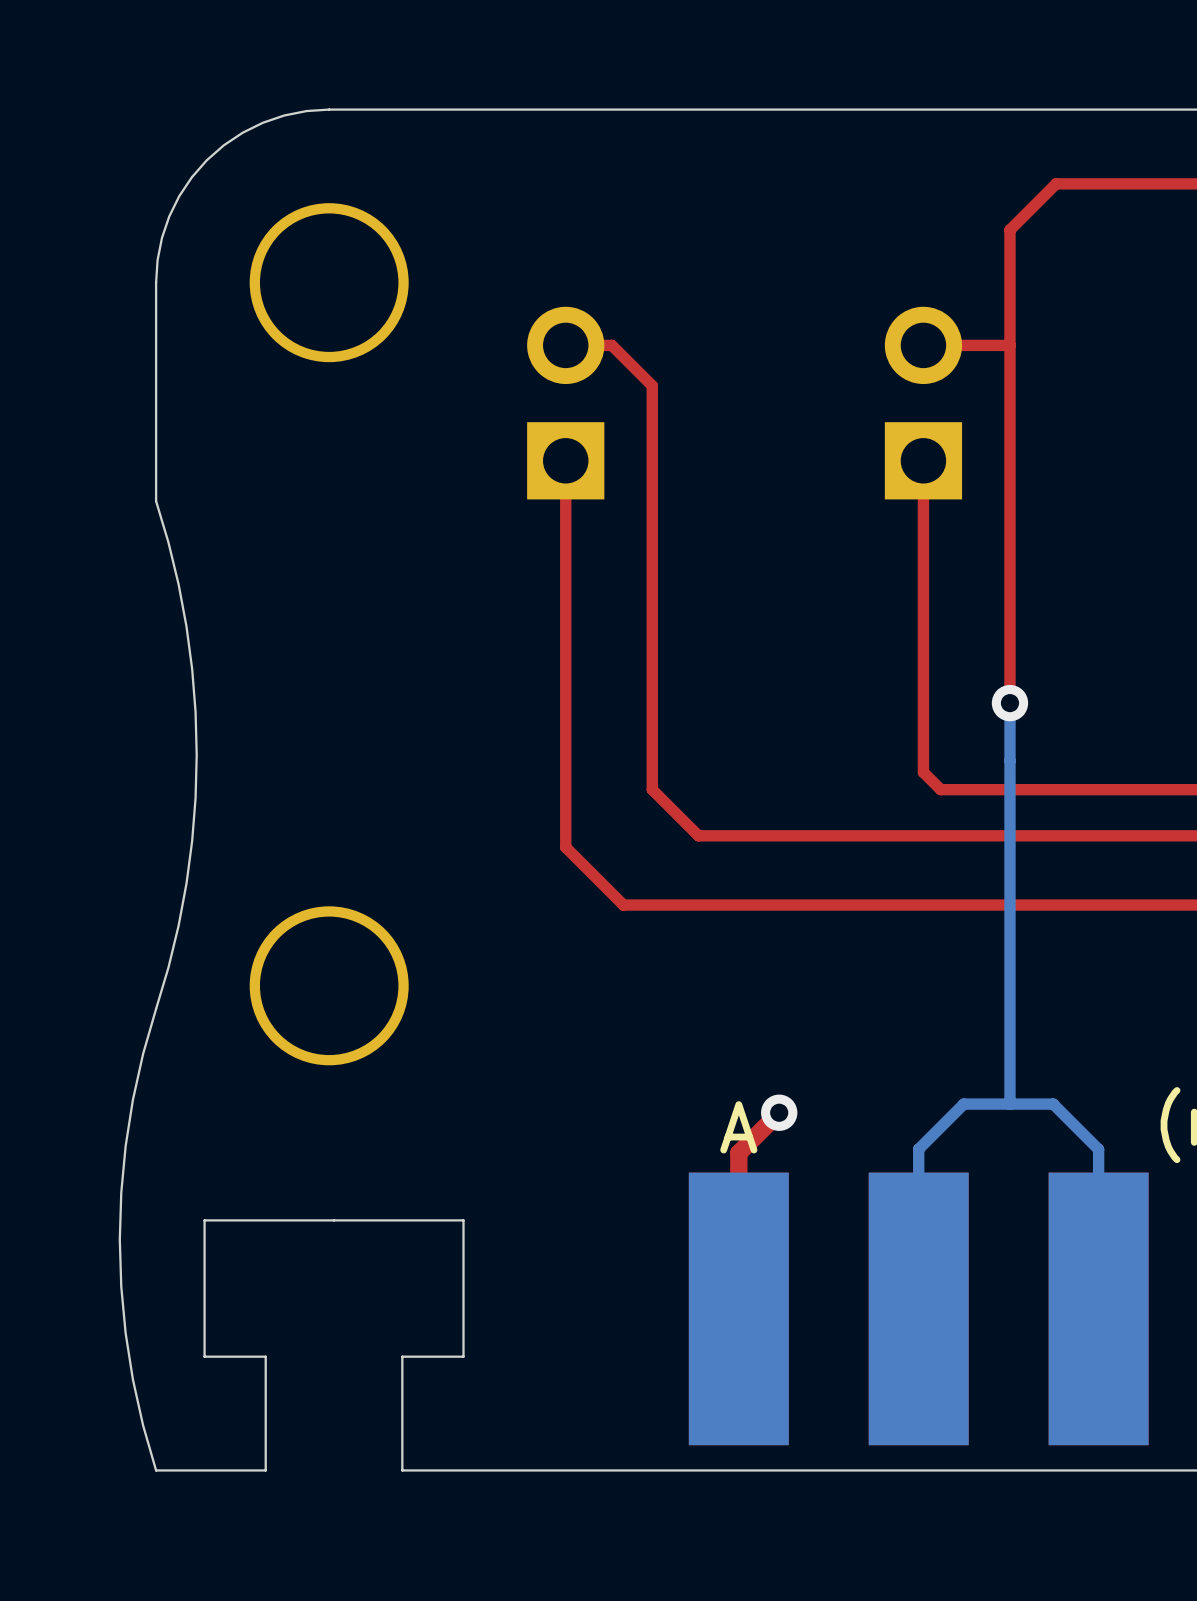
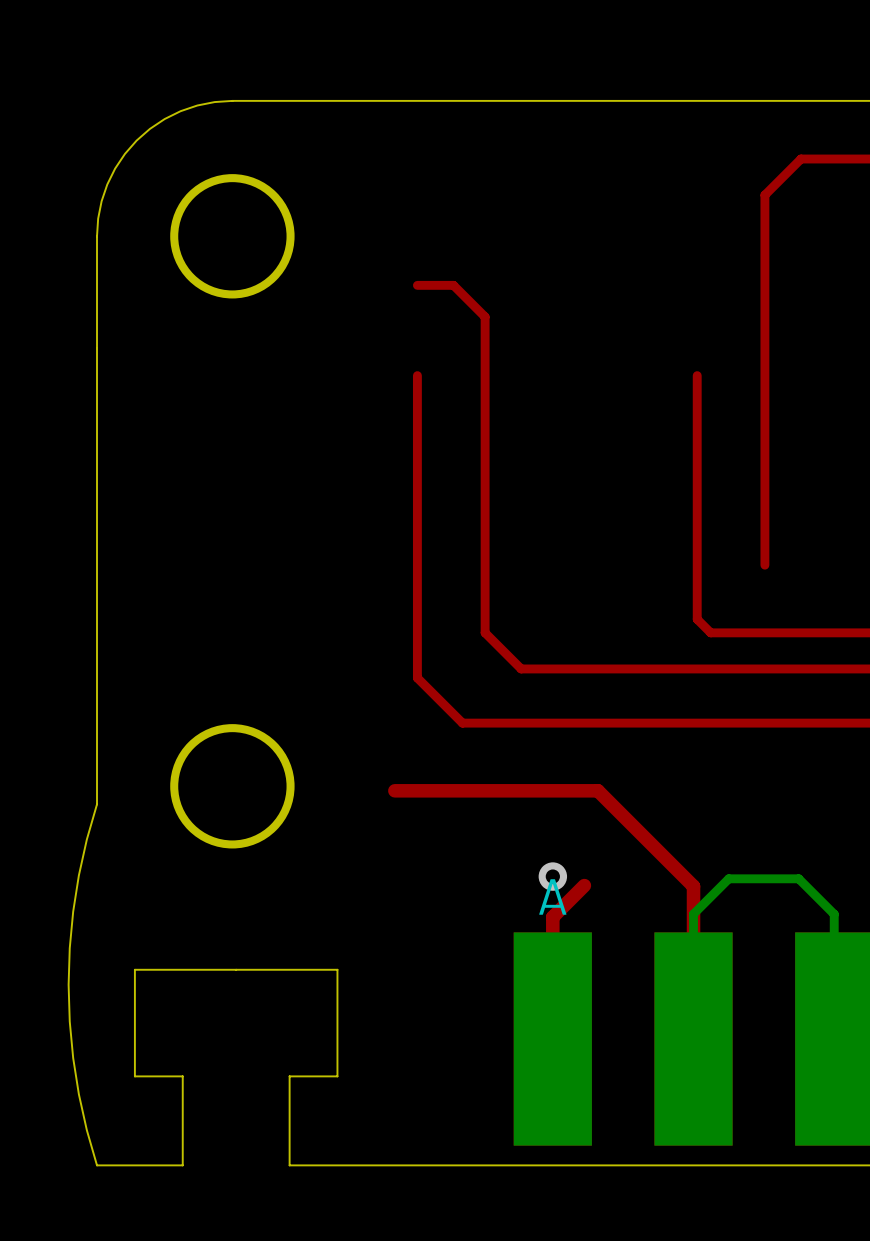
top track: (1009, 345) (923, 345) -> none
part: (565, 403) -> none
part: (923, 403) -> none
board edge: (156, 501) (178, 584) (186, 626) (192, 669) (196, 755) (195, 798) (186, 883) (168, 967) (156, 1008) -> (97, 407) (97, 804)
bottom track: (1009, 703) (1009, 1104) -> none
via: (1009, 703) -> none
top track: none -> (394, 790) (597, 790) (693, 886) (693, 1039)
via position: (779, 1112) -> (552, 876)

